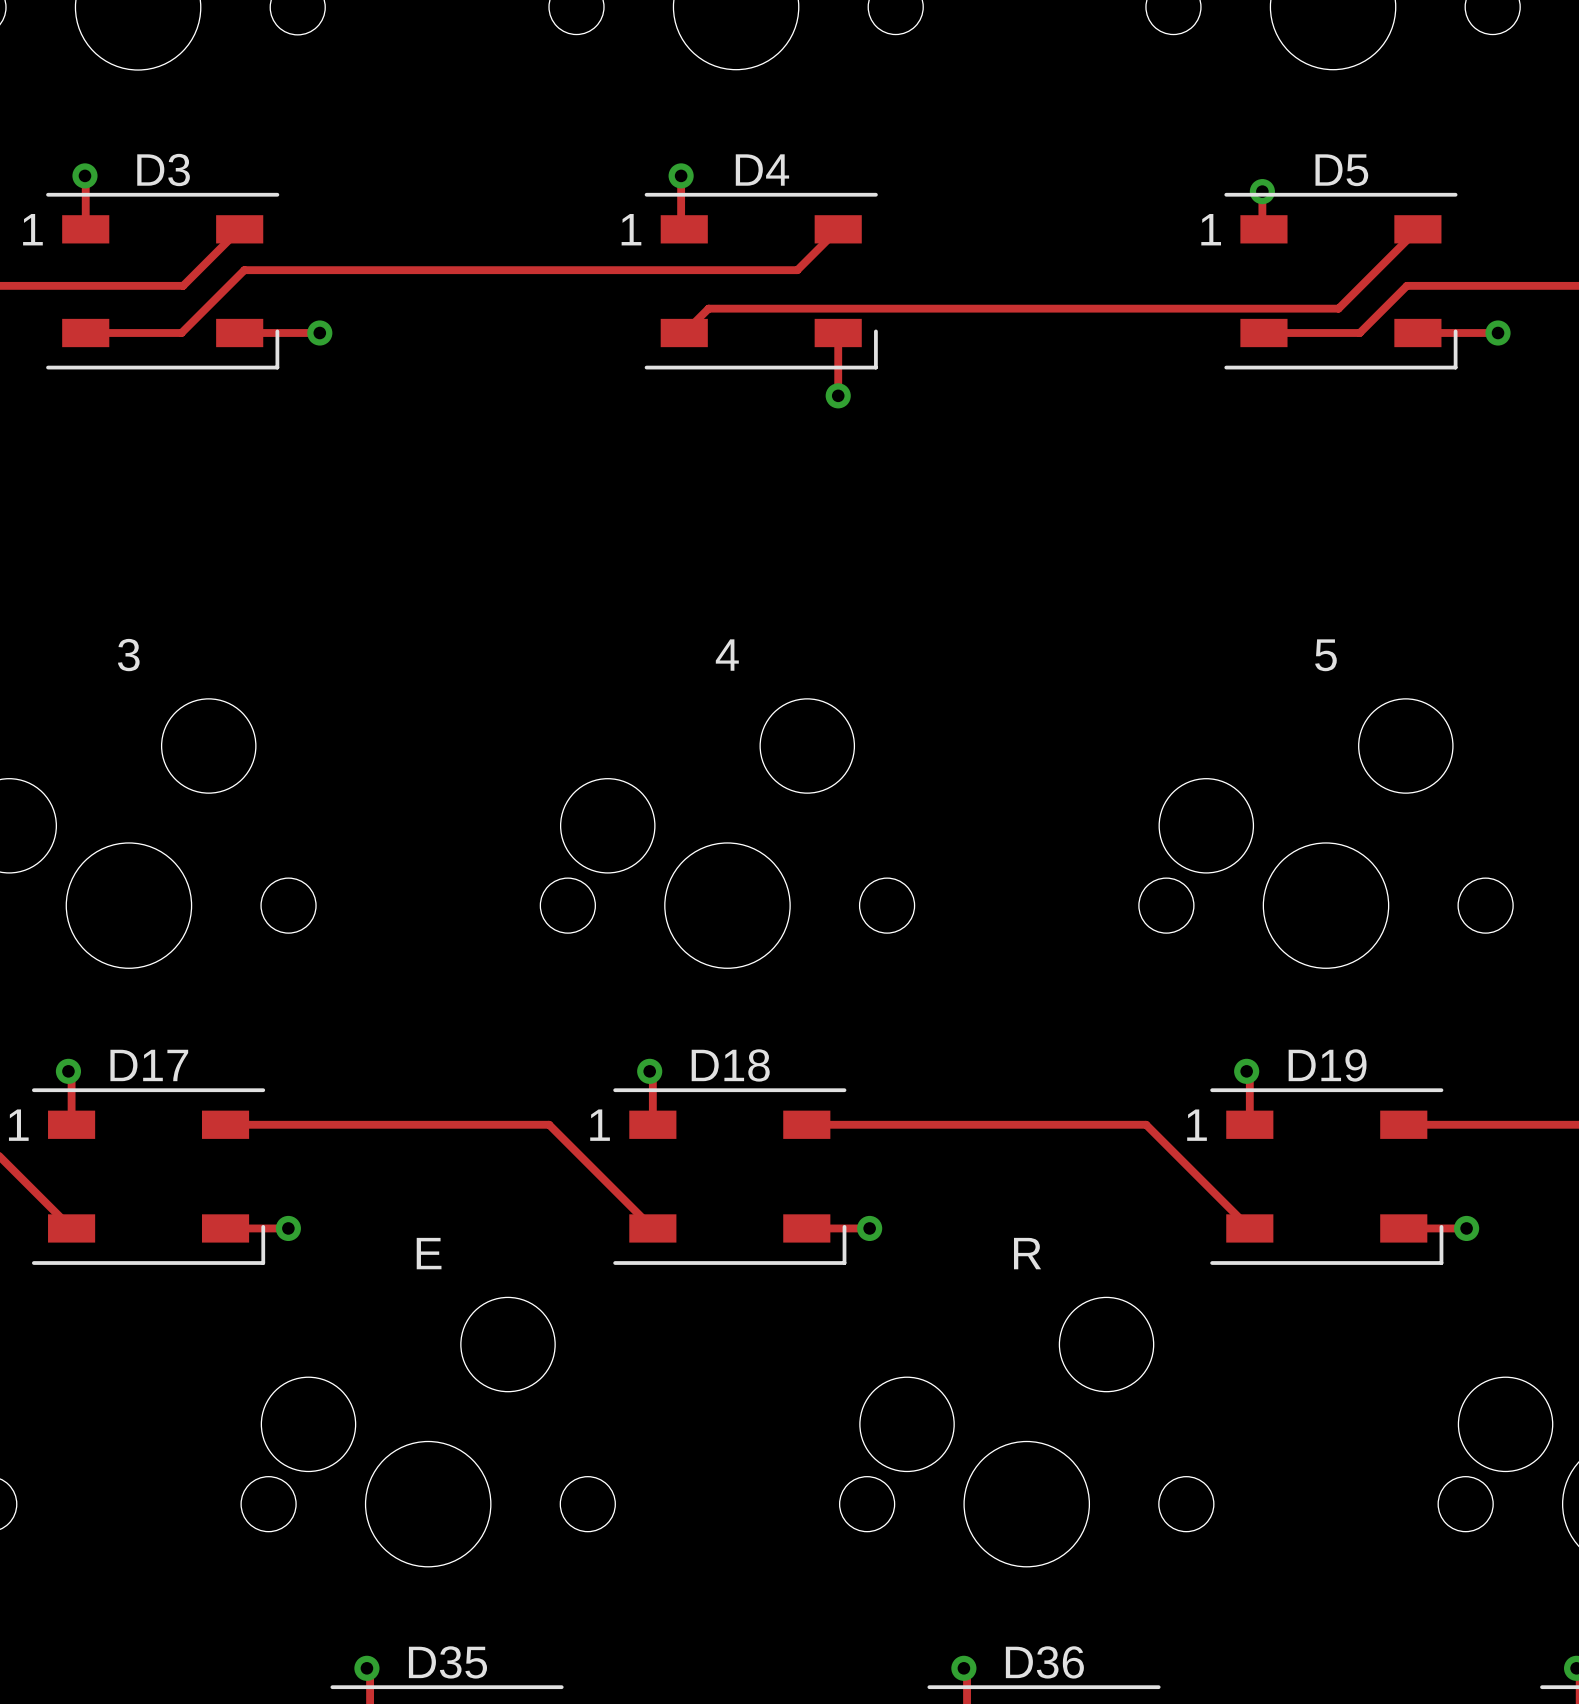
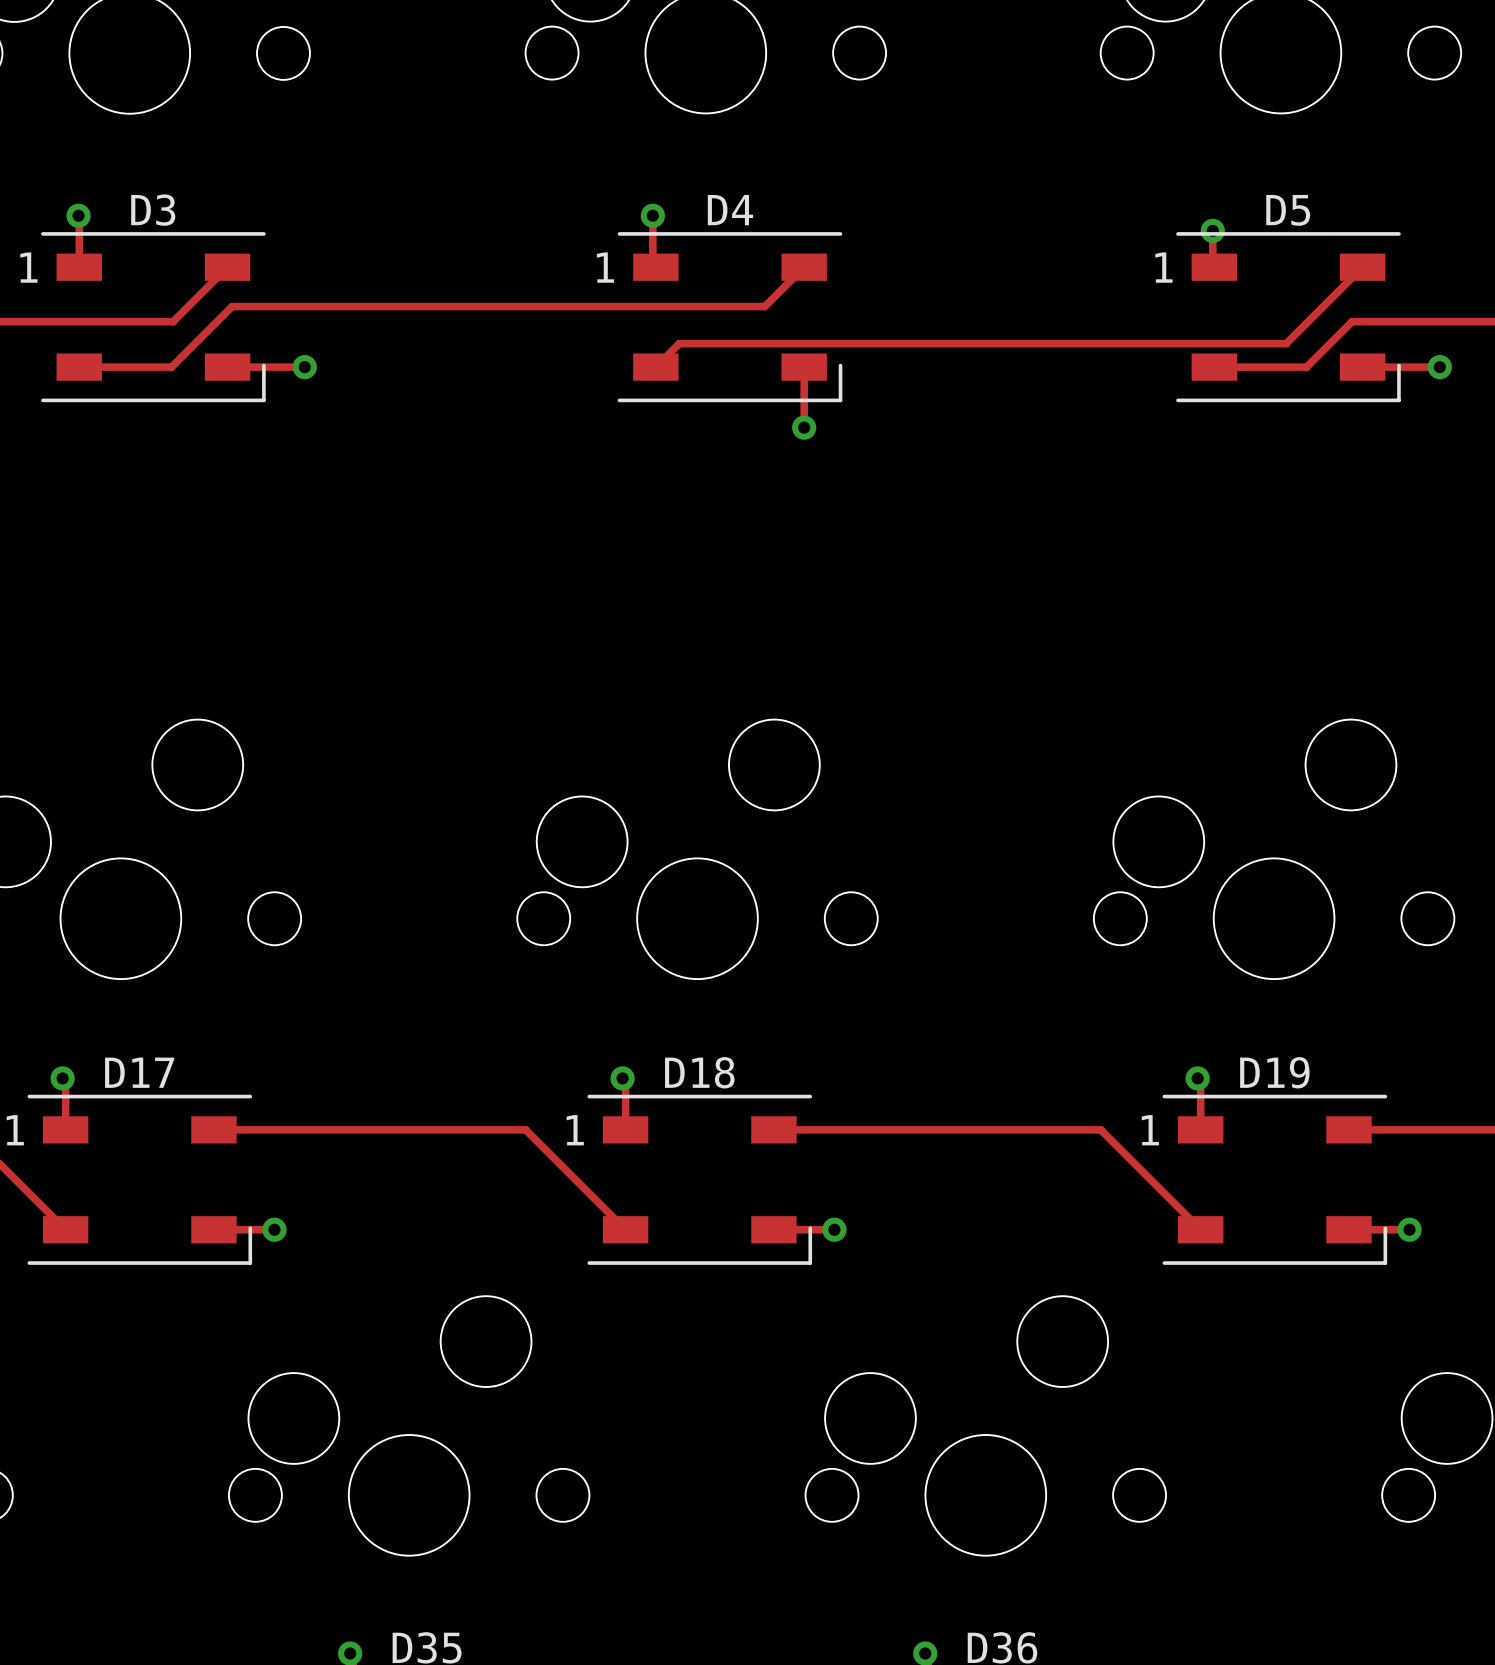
part value: 3 (128, 655) -> none
part value: 4 (727, 655) -> none
part value: 5 (1325, 655) -> none
part value: E (429, 1253) -> none
part value: R (1027, 1253) -> none

